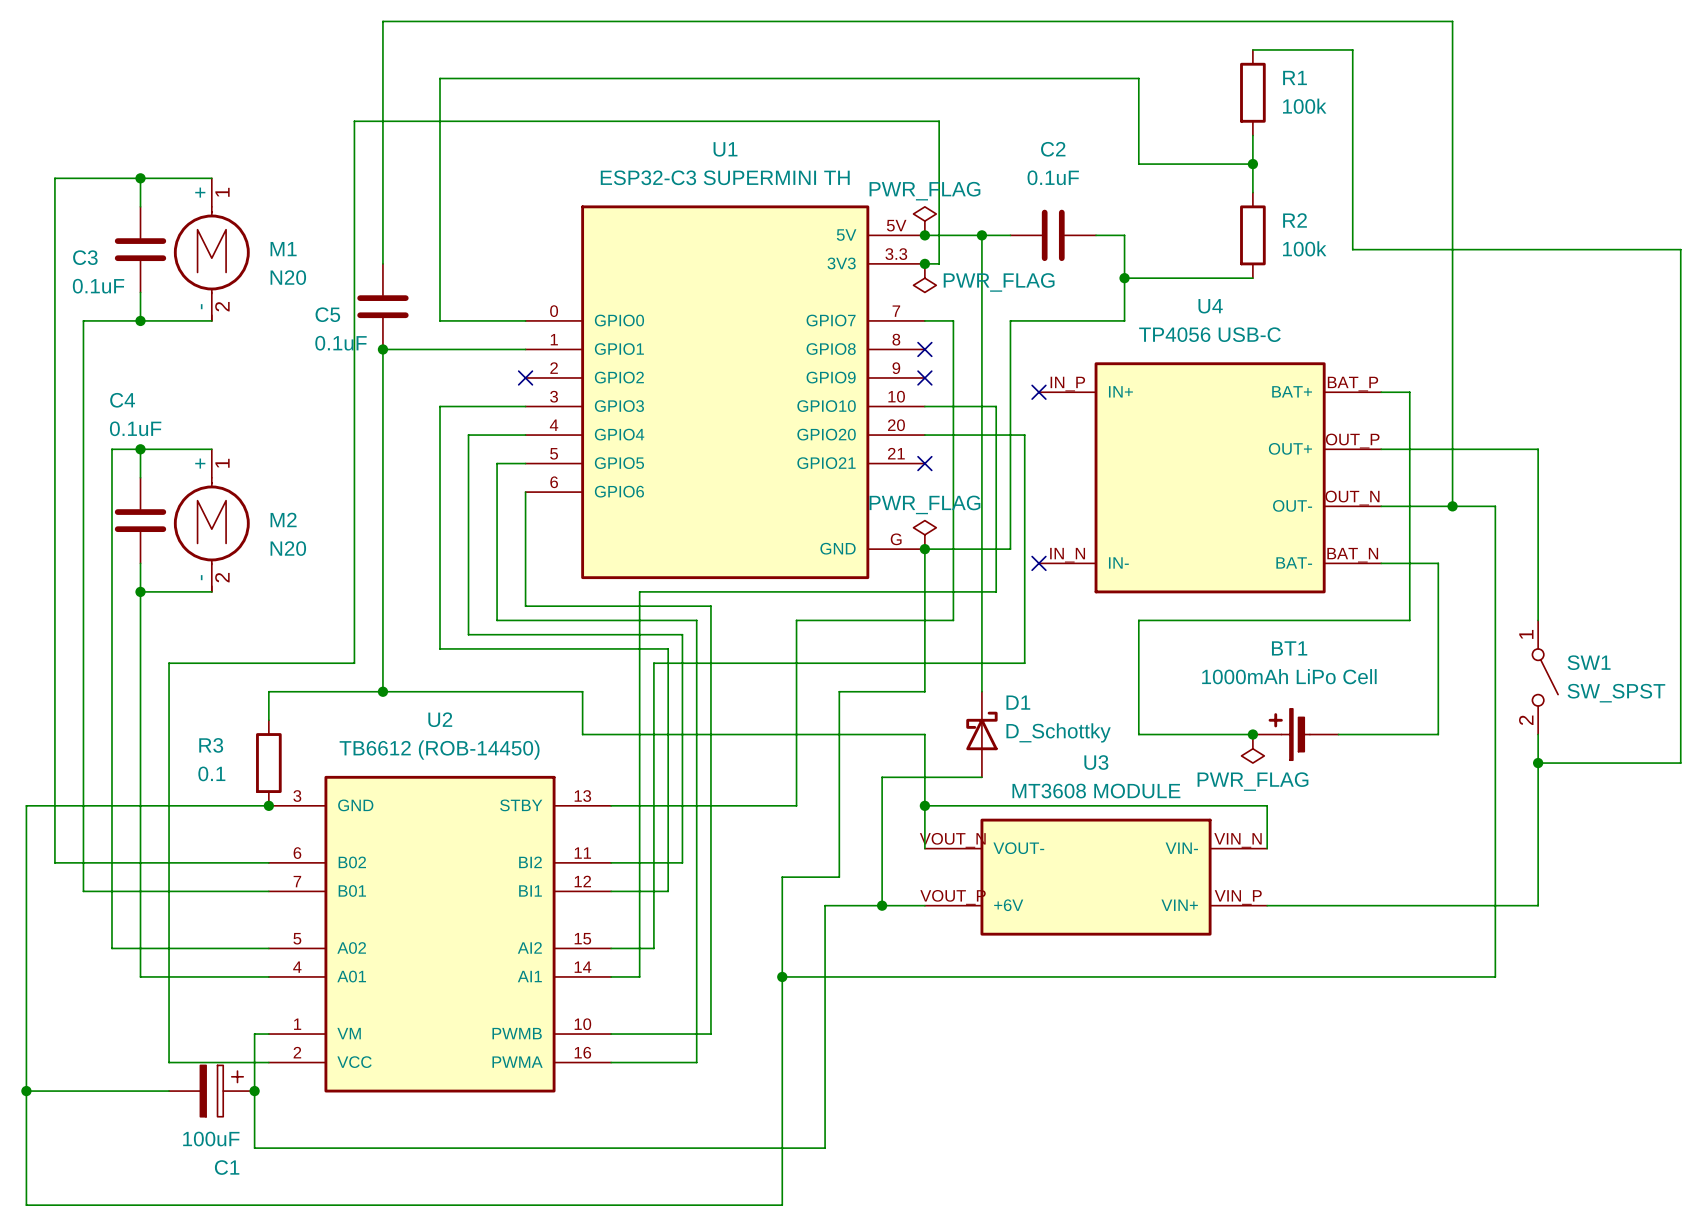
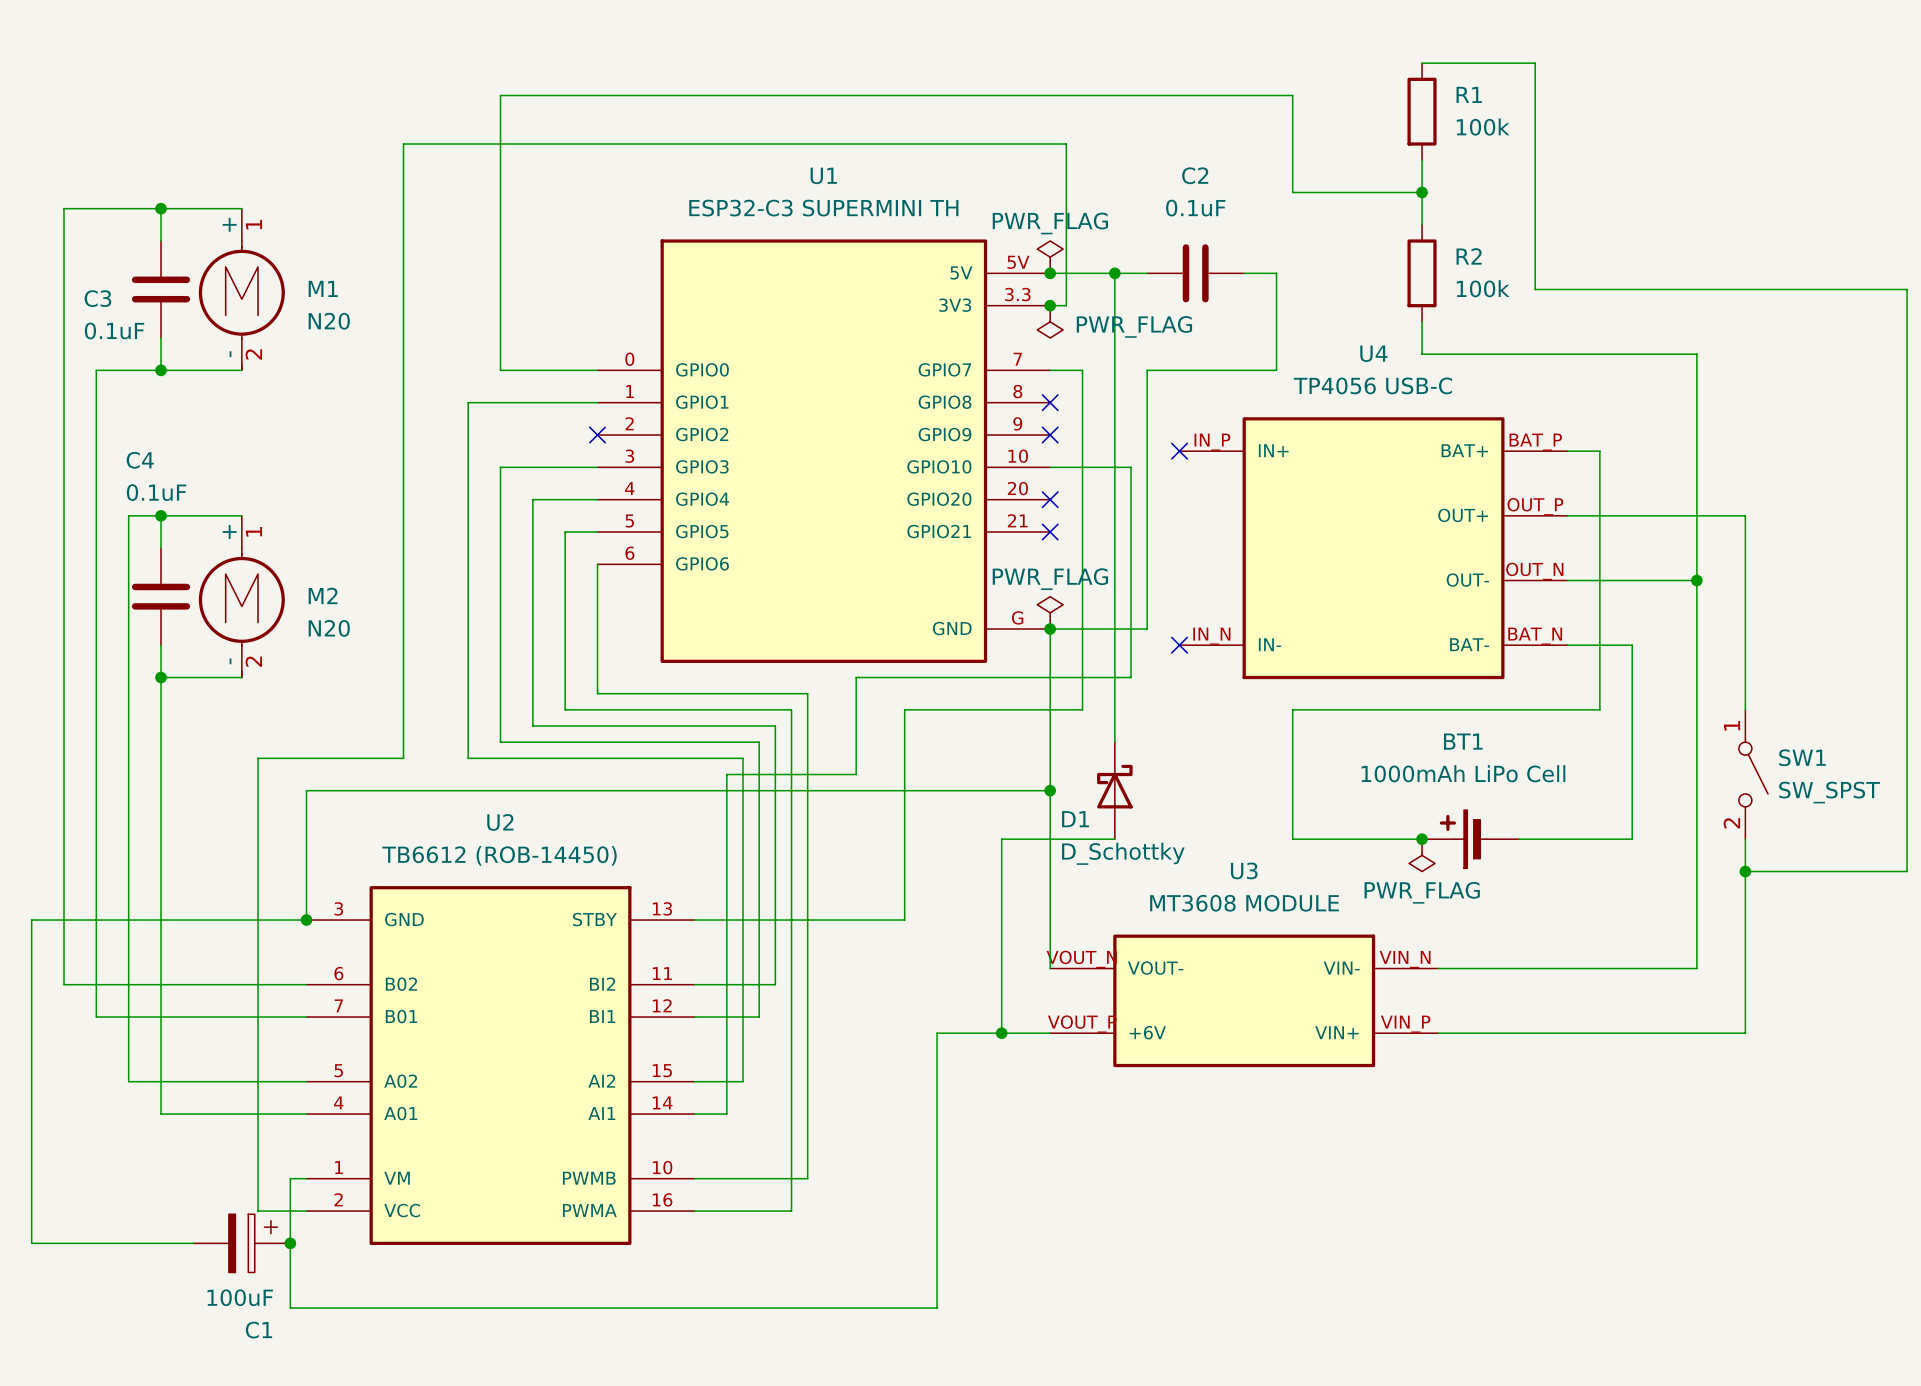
wire: (382, 263) (382, 21) (1452, 21) (1452, 506) -> none
wire: (1124, 278) (1252, 278) -> (1696, 580) (1696, 354) (1422, 354) (1422, 321)
junction: (1124, 278) -> none
C5: 0.1uF (382, 306) -> none
junction: (382, 349) -> none
wire: (411, 349) (382, 349) (382, 691) -> (468, 402) (468, 758) (743, 758)
wire: (924, 435) (1024, 435) (1024, 663) (653, 663) -> none
no-connect mark: none -> (1050, 499)
junction position: (1452, 506) -> (1696, 580)
wire: (753, 591) (639, 591) (639, 677) -> (856, 677) (856, 774) (726, 774)
wire: (226, 663) (169, 663) (169, 1062) (226, 1062) -> (258, 758) (258, 1211)
junction: (382, 691) -> none
wire: (582, 691) (582, 734) (882, 734) -> (662, 790) (953, 790)
wire: (839, 691) (839, 877) (782, 877) (782, 1205) (26, 1205) (26, 1091) -> none
wire: none -> (1050, 790) (1050, 839) (1114, 839)
junction: none -> (1050, 790)
D1 name position: D1 (1018, 702) -> D1 (1075, 819)
wire: none -> (306, 823) (306, 920)
D1 value position: D_Schottky (1058, 732) -> D_Schottky (1123, 853)
D1 position: (981, 734) -> (1114, 790)
R3: 0.1 (268, 763) -> none
wire: (882, 777) (981, 777) -> (1001, 887) (1001, 839)
wire: (924, 805) (1267, 805) (1267, 848) -> none
junction: (924, 805) -> none
wire: (1495, 848) (1495, 976) (782, 976) -> (1696, 968) (1438, 968)
junction: (782, 976) -> none
junction: (26, 1091) -> none

